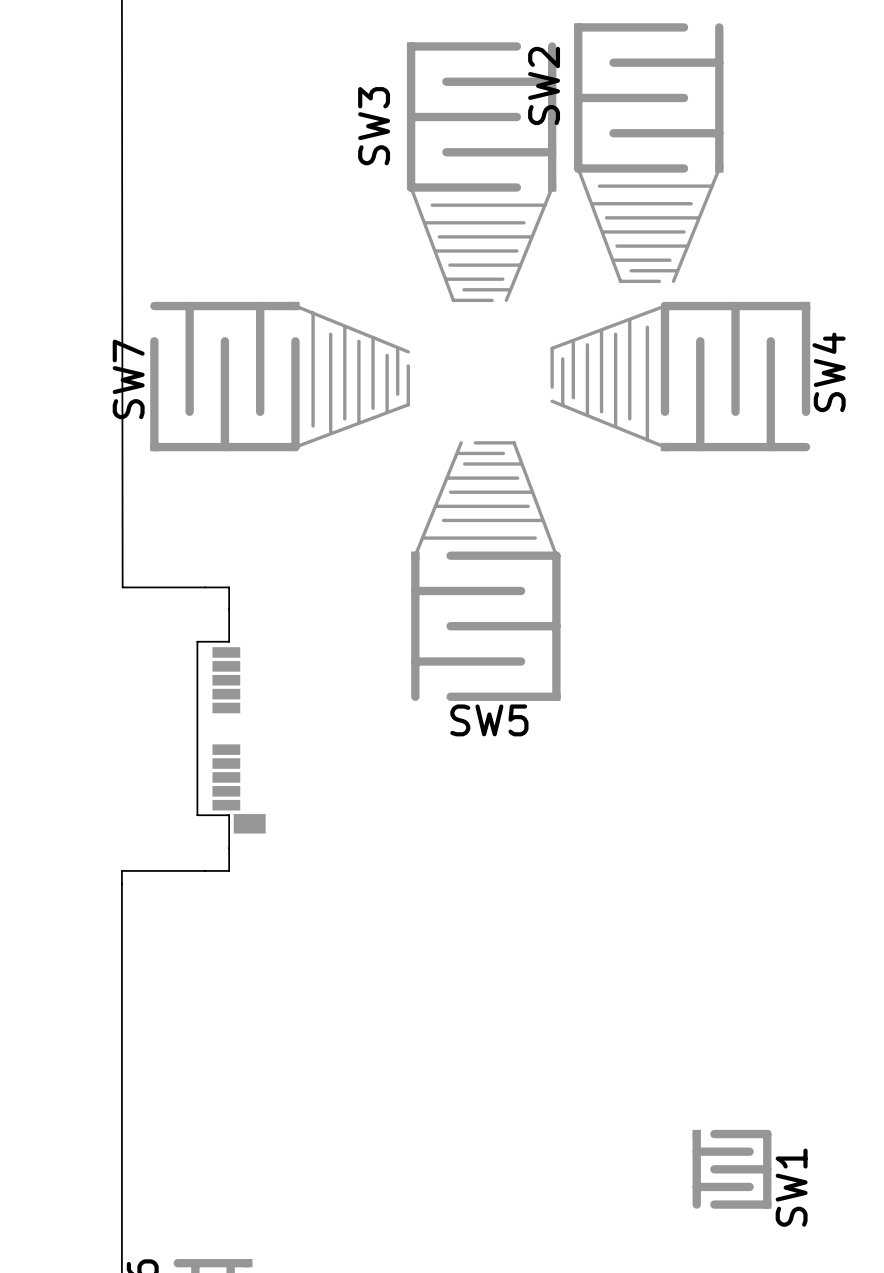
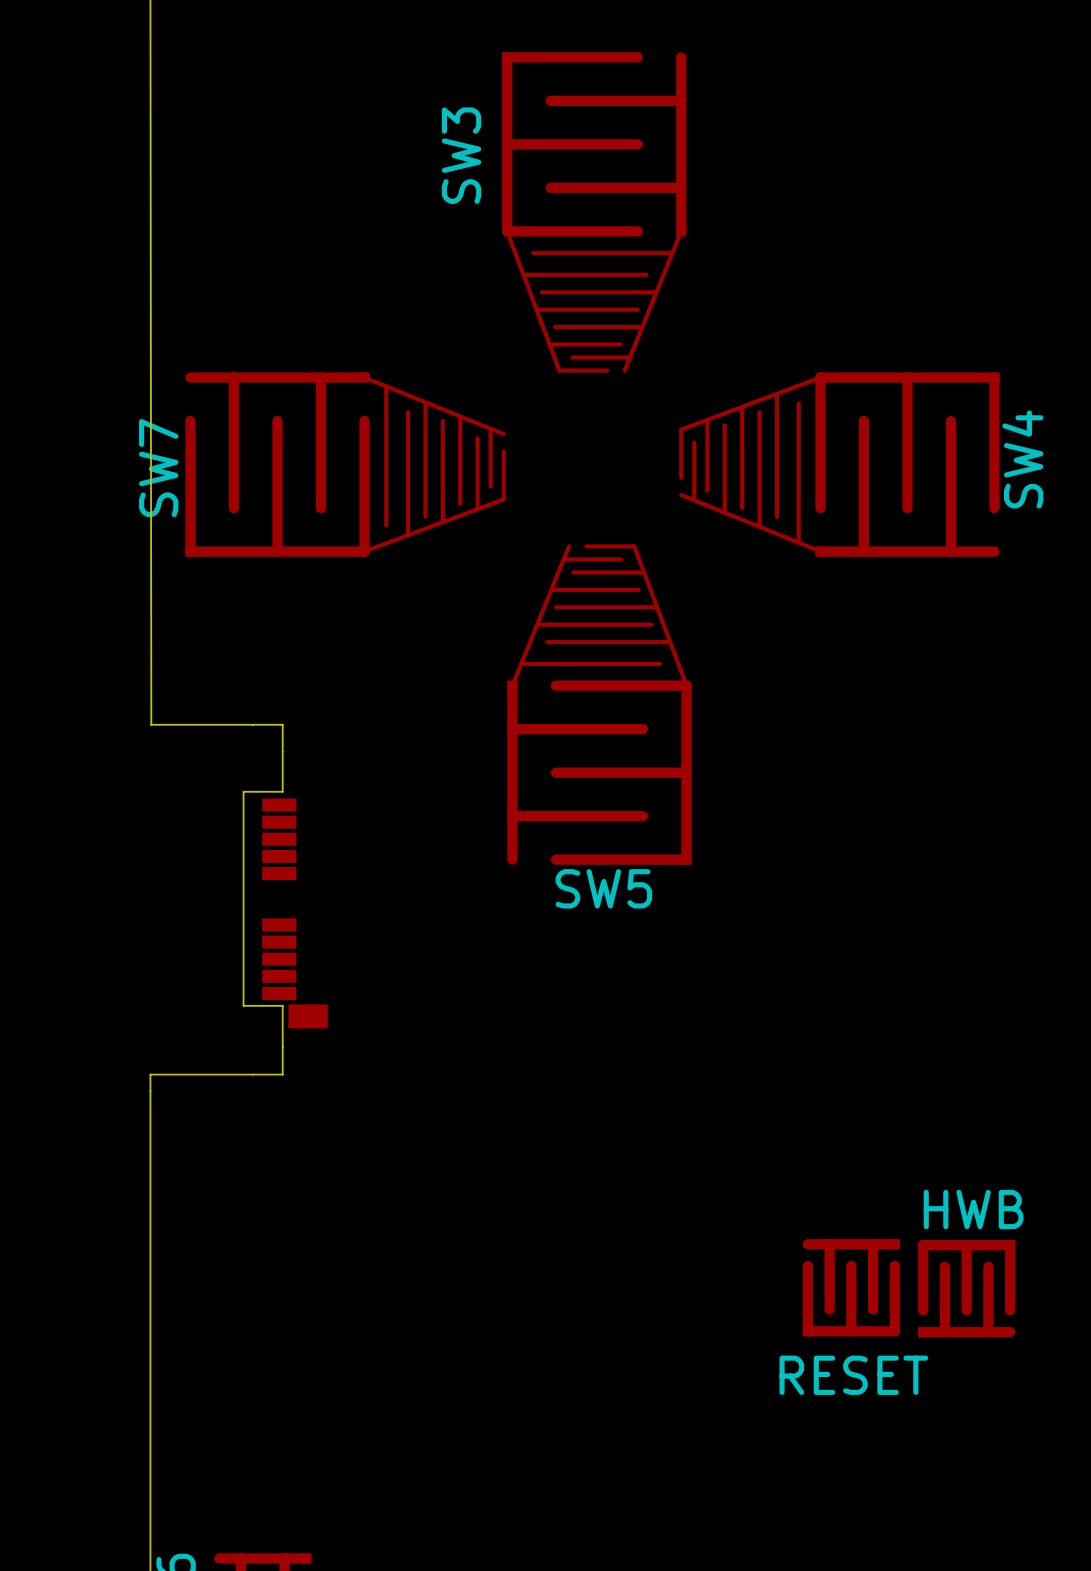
SW2: (648, 153) -> none
RESET: none -> (851, 1287)
HWB: none -> (966, 1288)
SW1: (732, 1169) -> none

